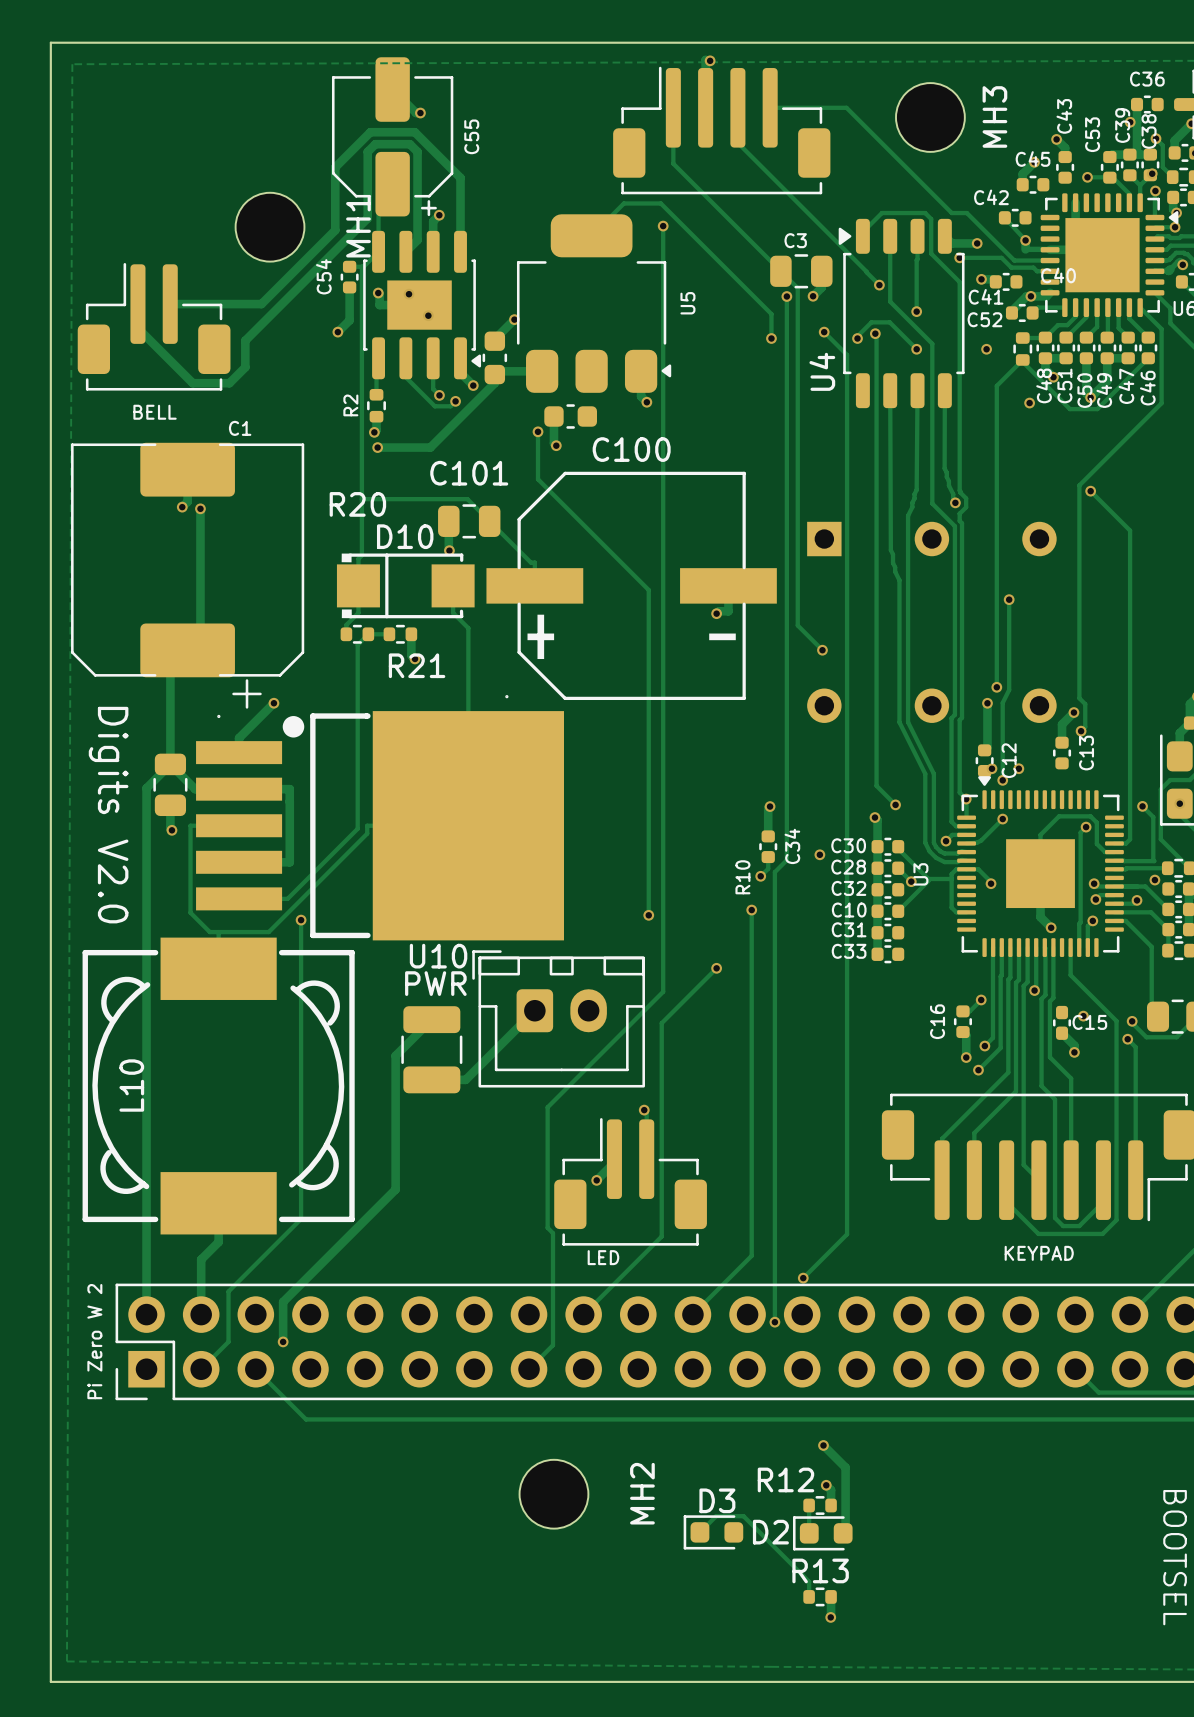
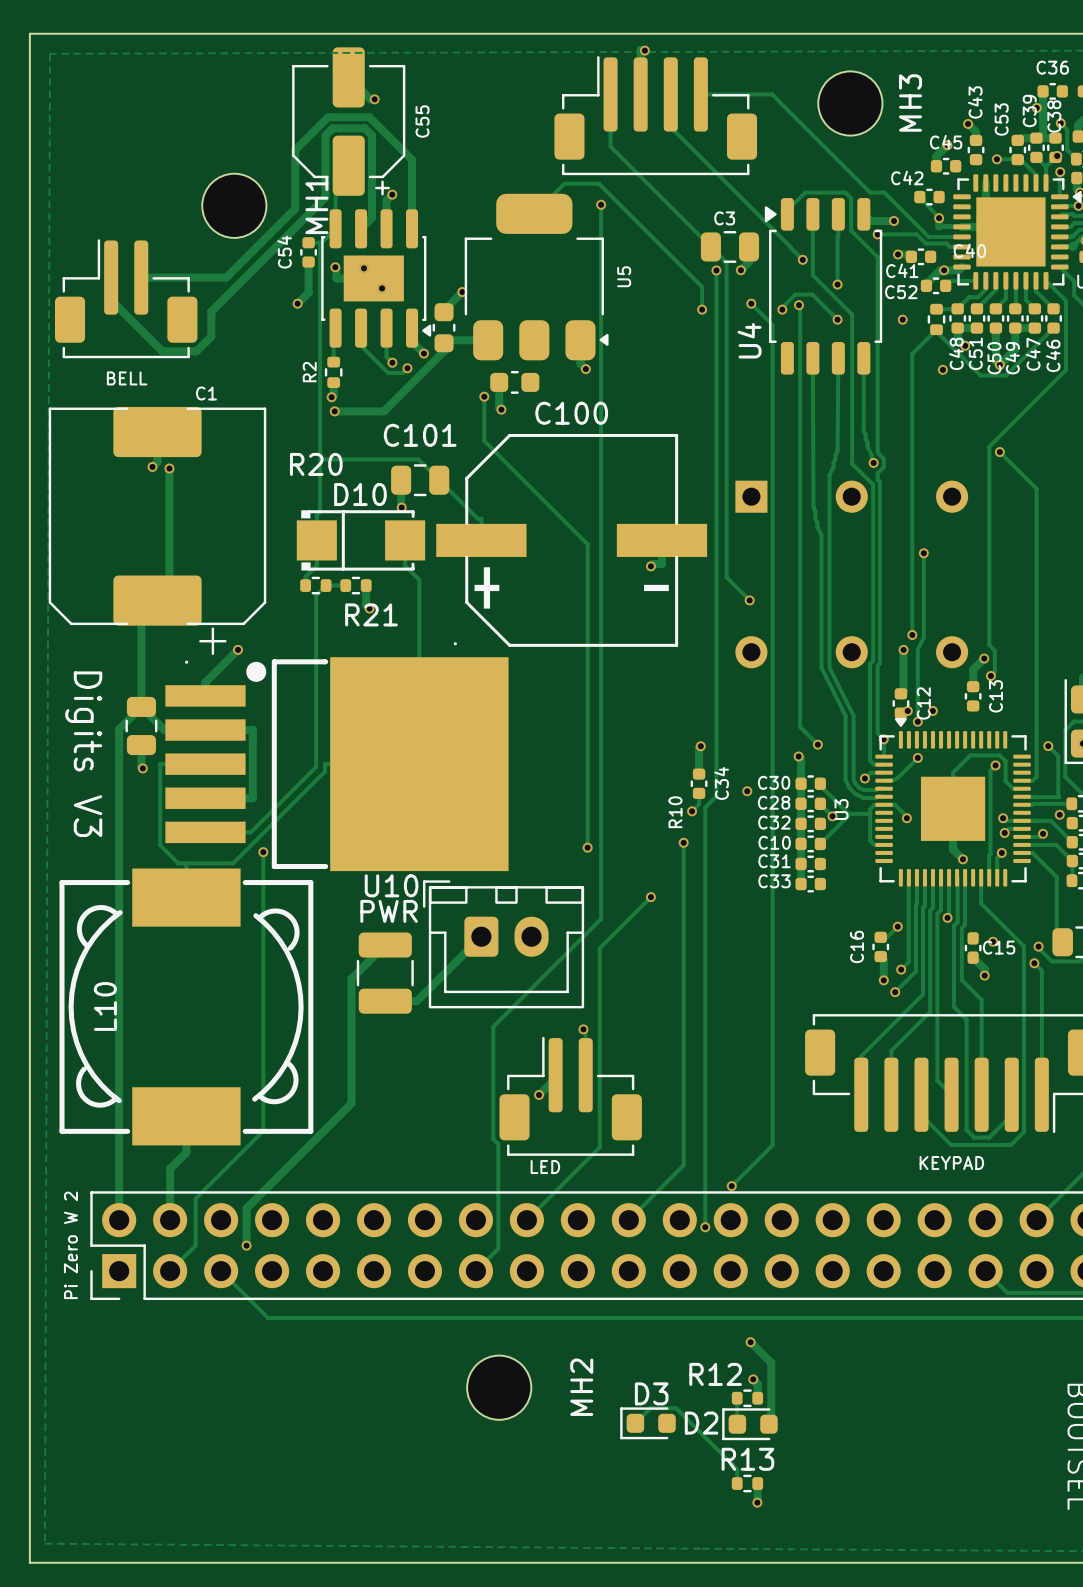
text: Digits V2.0 (108, 815) -> Digits V3 (83, 754)

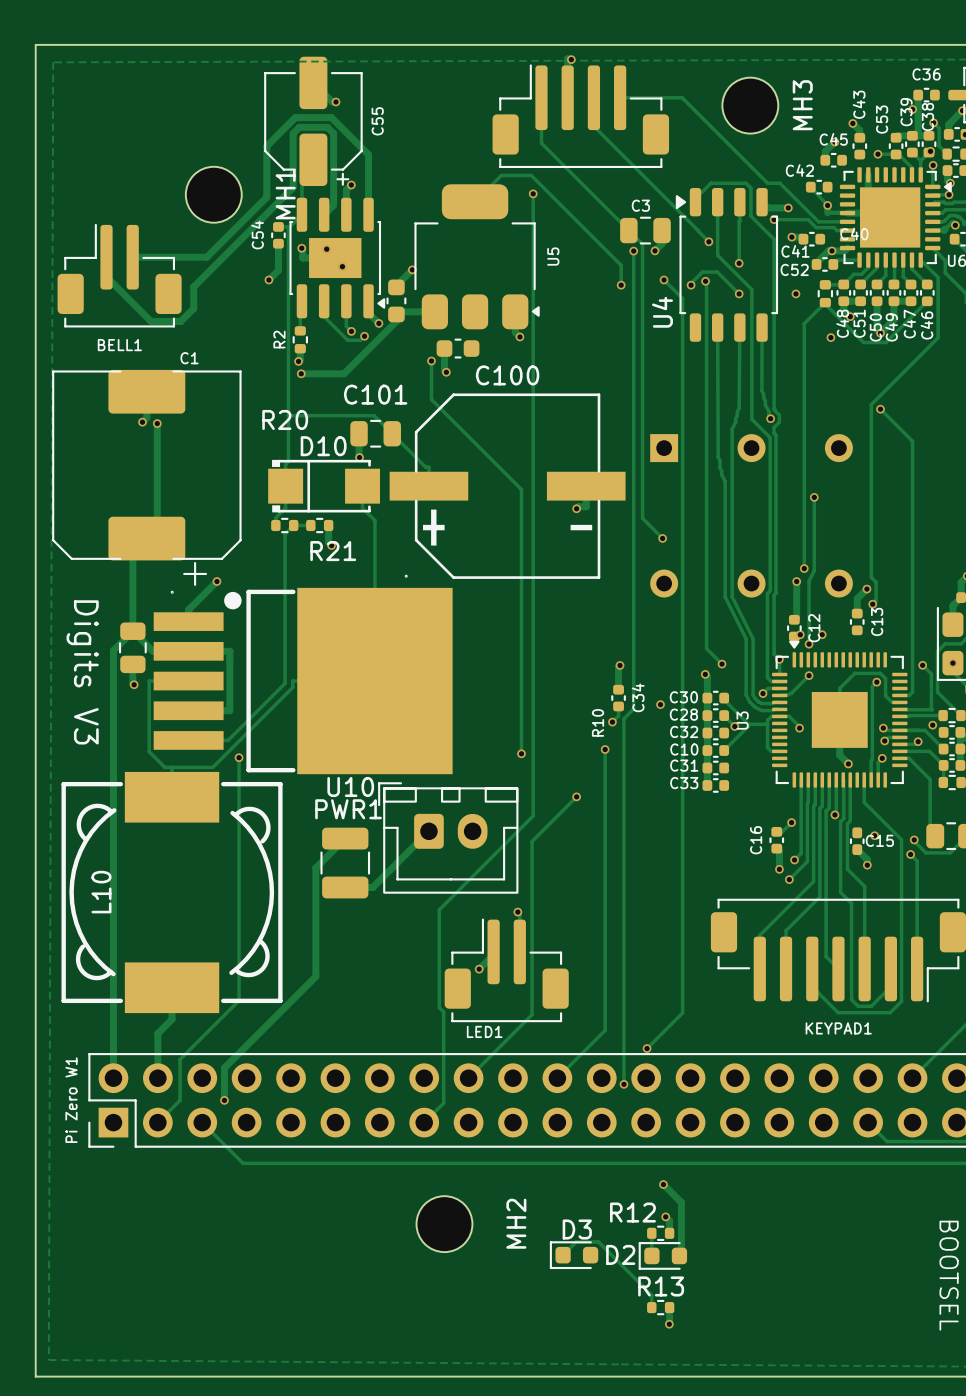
BELL name: BELL (127, 378) -> BELL1 (119, 345)
PWR name: PWR (389, 911) -> PWR1 (348, 809)
KEYPAD name: KEYPAD (951, 1163) -> KEYPAD1 (838, 1028)
LED name: LED (545, 1167) -> LED1 (484, 1031)
Pi Zero W 2 name: Pi Zero W 2 (70, 1245) -> Pi Zero W1 (71, 1100)

